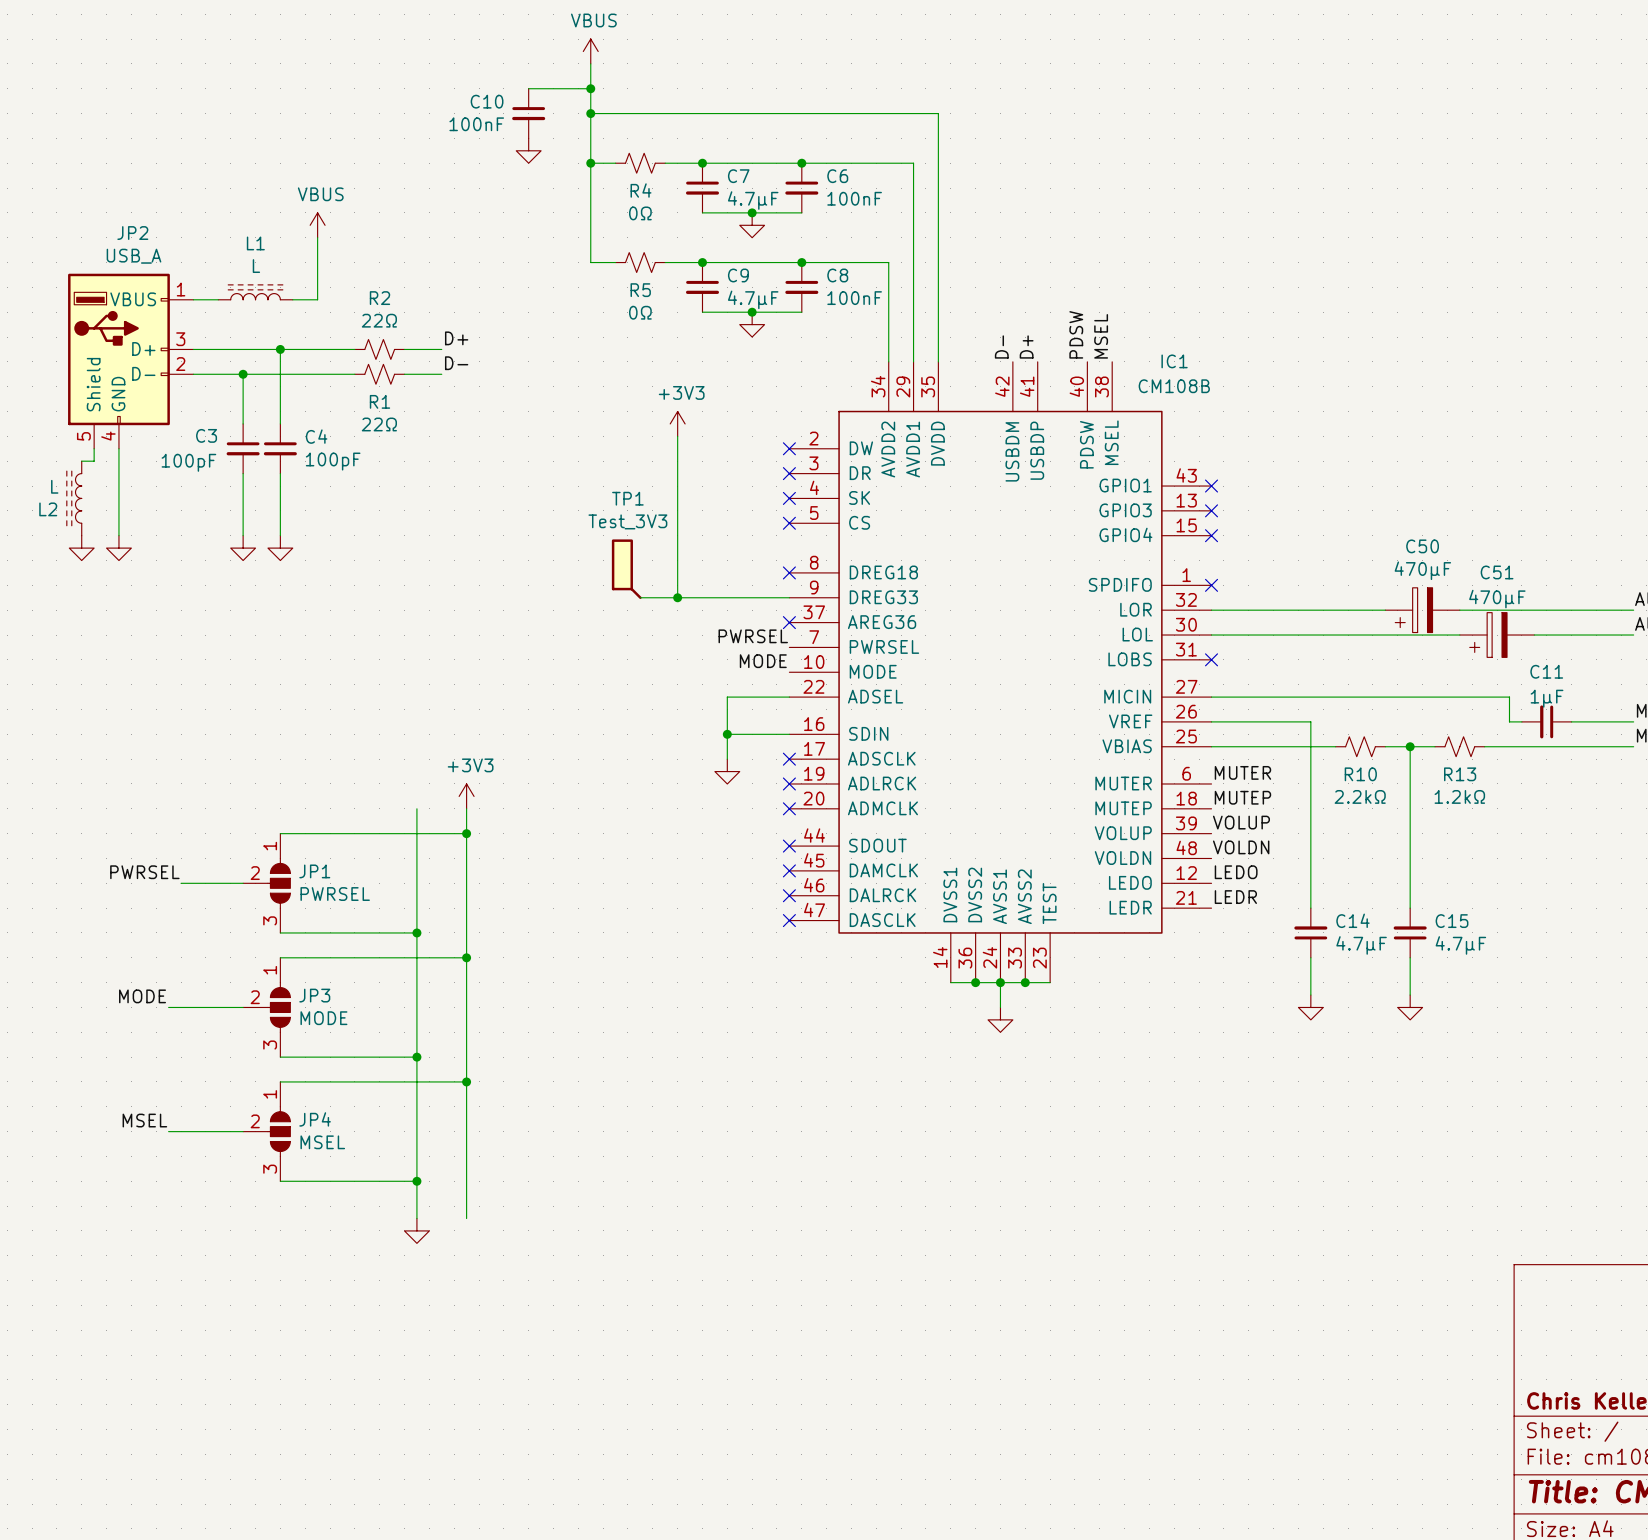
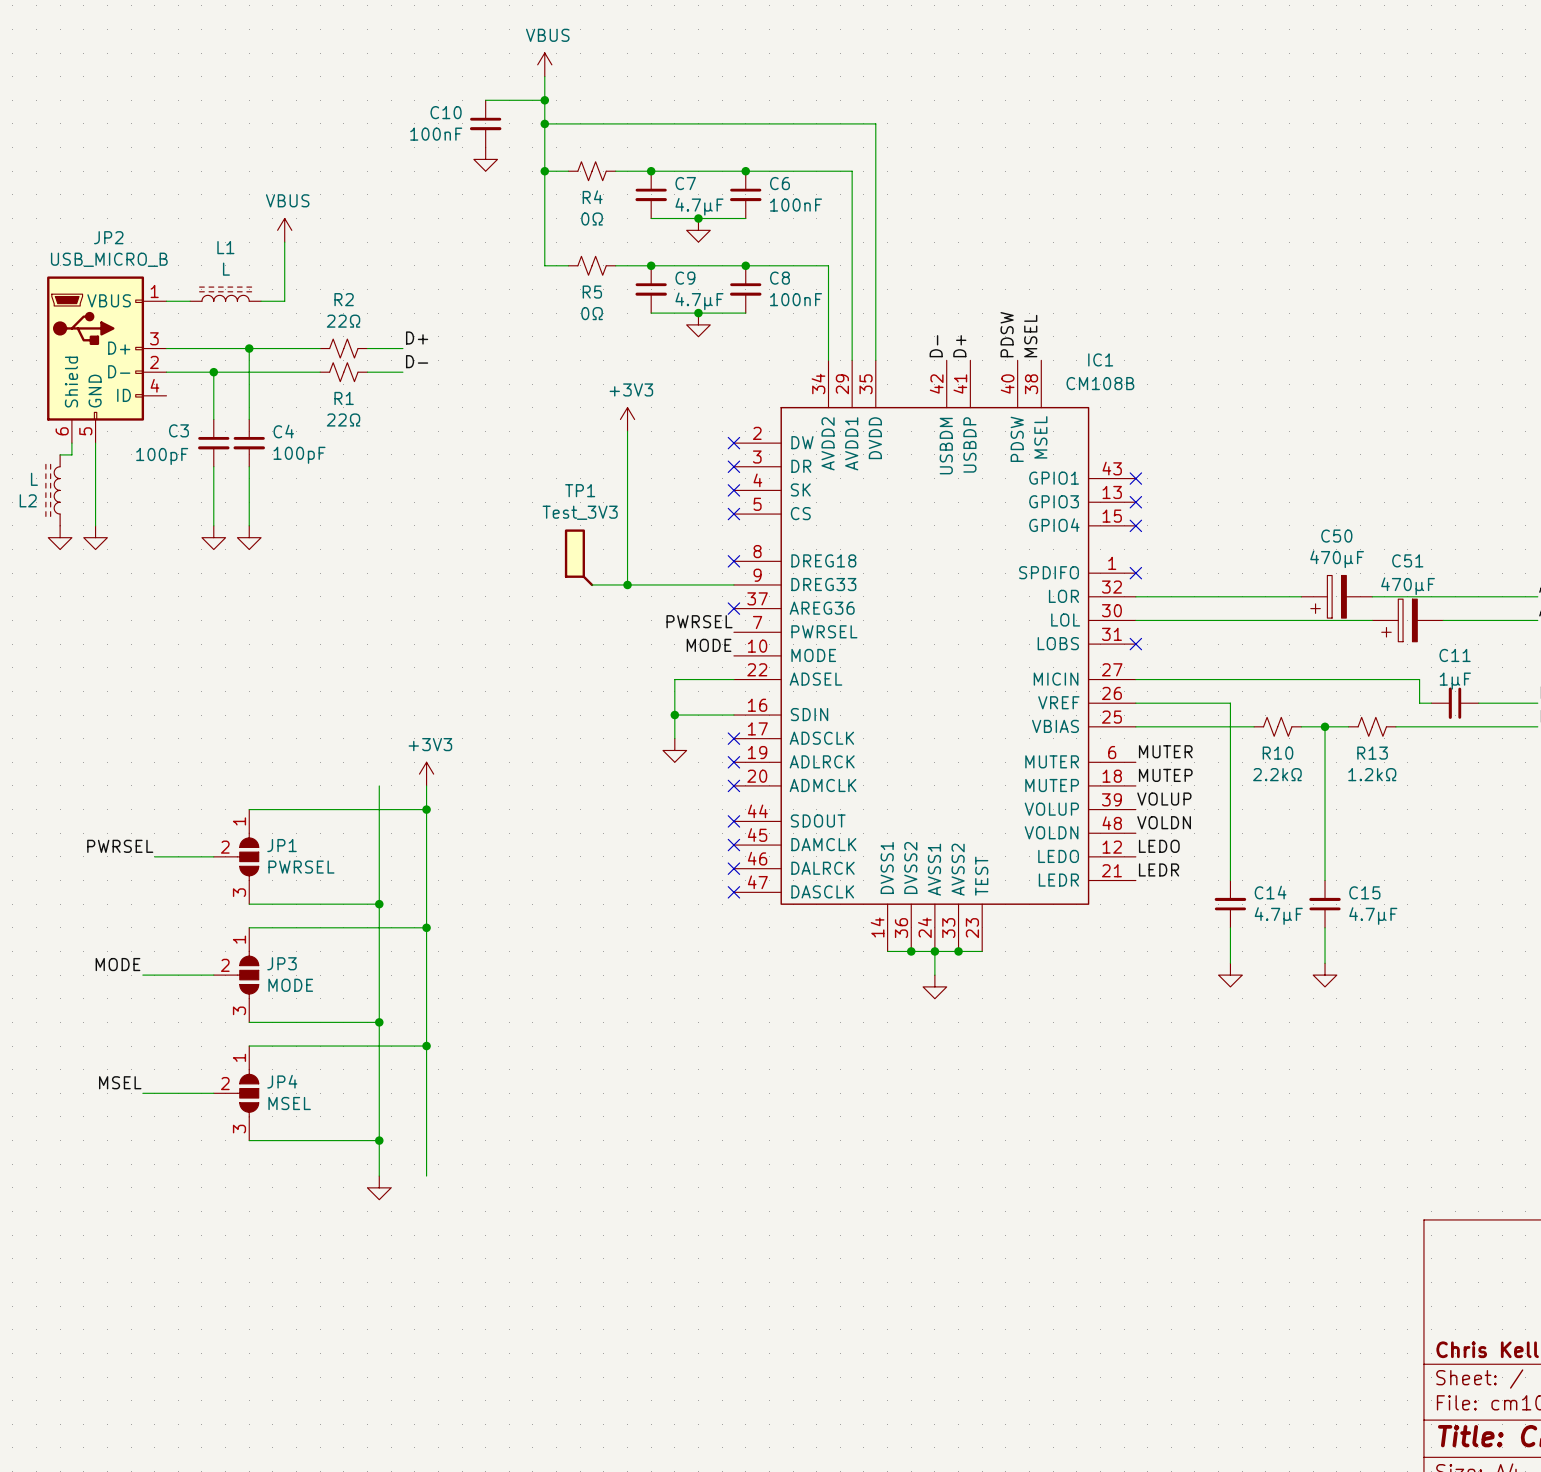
JP2 value: USB_A (134, 256) -> USB_MICRO_B (109, 259)
JP2 symbol: [68, 273, 194, 449] -> [47, 276, 167, 444]

